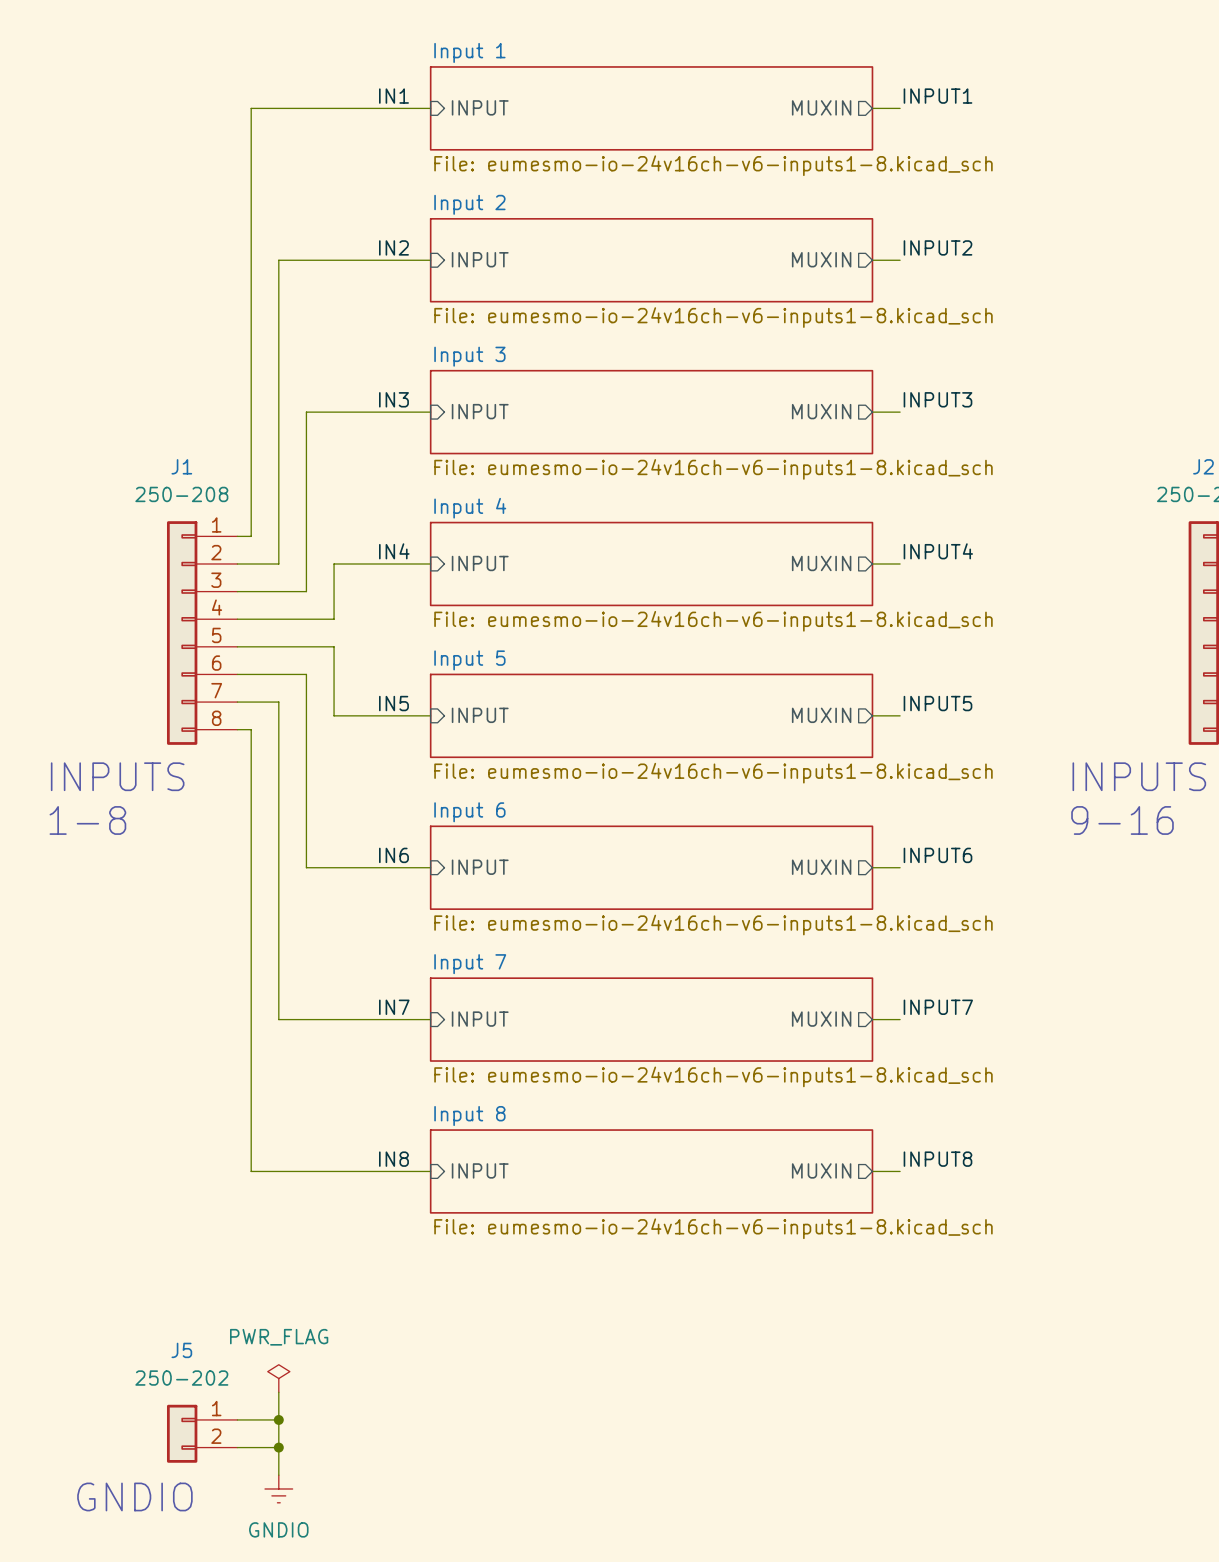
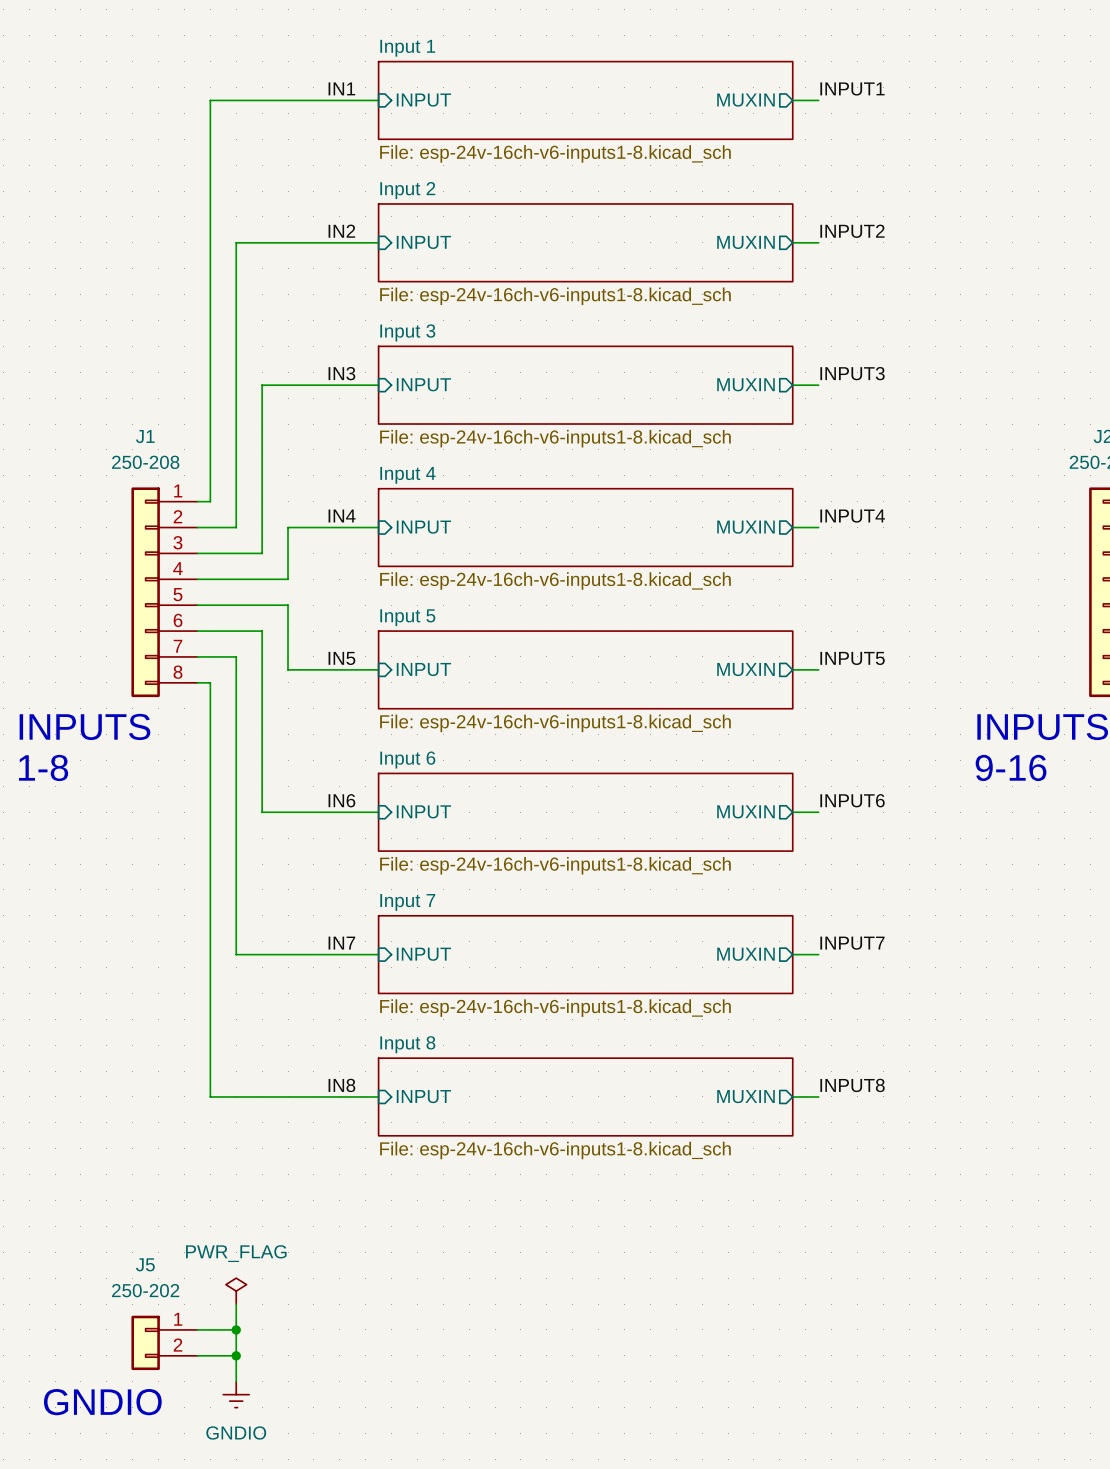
sheet Input 1 value: File: eumesmo-io-24v16ch-v6-inputs1-8.kicad_sch (713, 165) -> File: esp-24v-16ch-v6-inputs1-8.kicad_sch (555, 153)
sheet Input 2 value: File: eumesmo-io-24v16ch-v6-inputs1-8.kicad_sch (713, 317) -> File: esp-24v-16ch-v6-inputs1-8.kicad_sch (555, 296)
sheet Input 3 value: File: eumesmo-io-24v16ch-v6-inputs1-8.kicad_sch (713, 469) -> File: esp-24v-16ch-v6-inputs1-8.kicad_sch (555, 438)
sheet Input 4 value: File: eumesmo-io-24v16ch-v6-inputs1-8.kicad_sch (713, 621) -> File: esp-24v-16ch-v6-inputs1-8.kicad_sch (555, 581)
sheet Input 5 value: File: eumesmo-io-24v16ch-v6-inputs1-8.kicad_sch (713, 773) -> File: esp-24v-16ch-v6-inputs1-8.kicad_sch (555, 723)
sheet Input 6 value: File: eumesmo-io-24v16ch-v6-inputs1-8.kicad_sch (713, 925) -> File: esp-24v-16ch-v6-inputs1-8.kicad_sch (555, 865)
sheet Input 7 value: File: eumesmo-io-24v16ch-v6-inputs1-8.kicad_sch (713, 1076) -> File: esp-24v-16ch-v6-inputs1-8.kicad_sch (555, 1008)
sheet Input 8 value: File: eumesmo-io-24v16ch-v6-inputs1-8.kicad_sch (713, 1228) -> File: esp-24v-16ch-v6-inputs1-8.kicad_sch (555, 1150)

